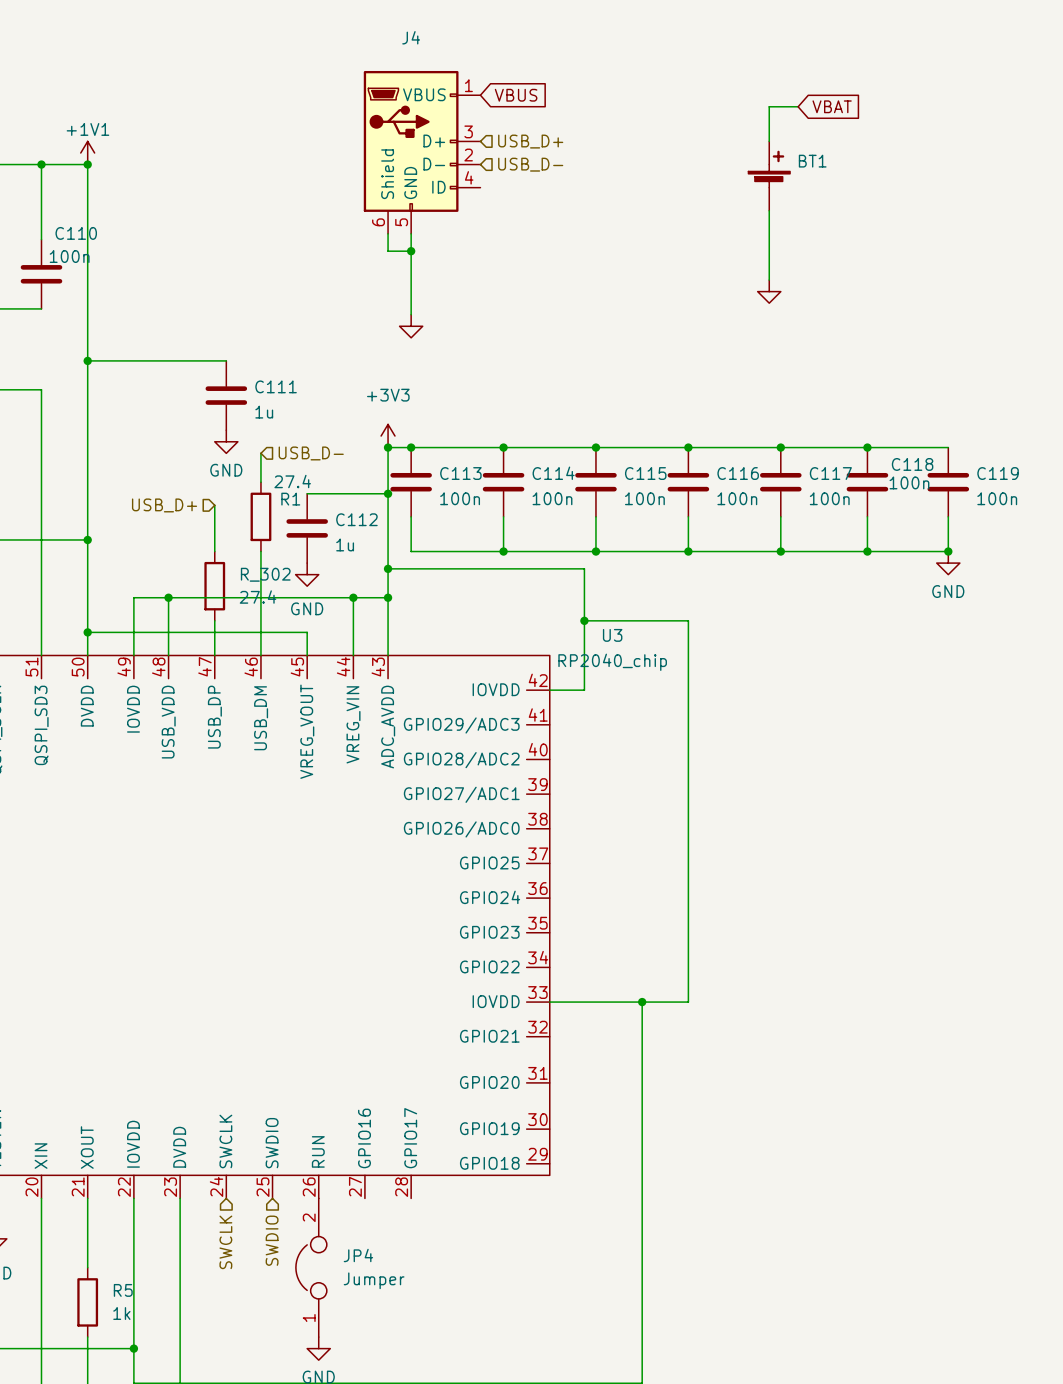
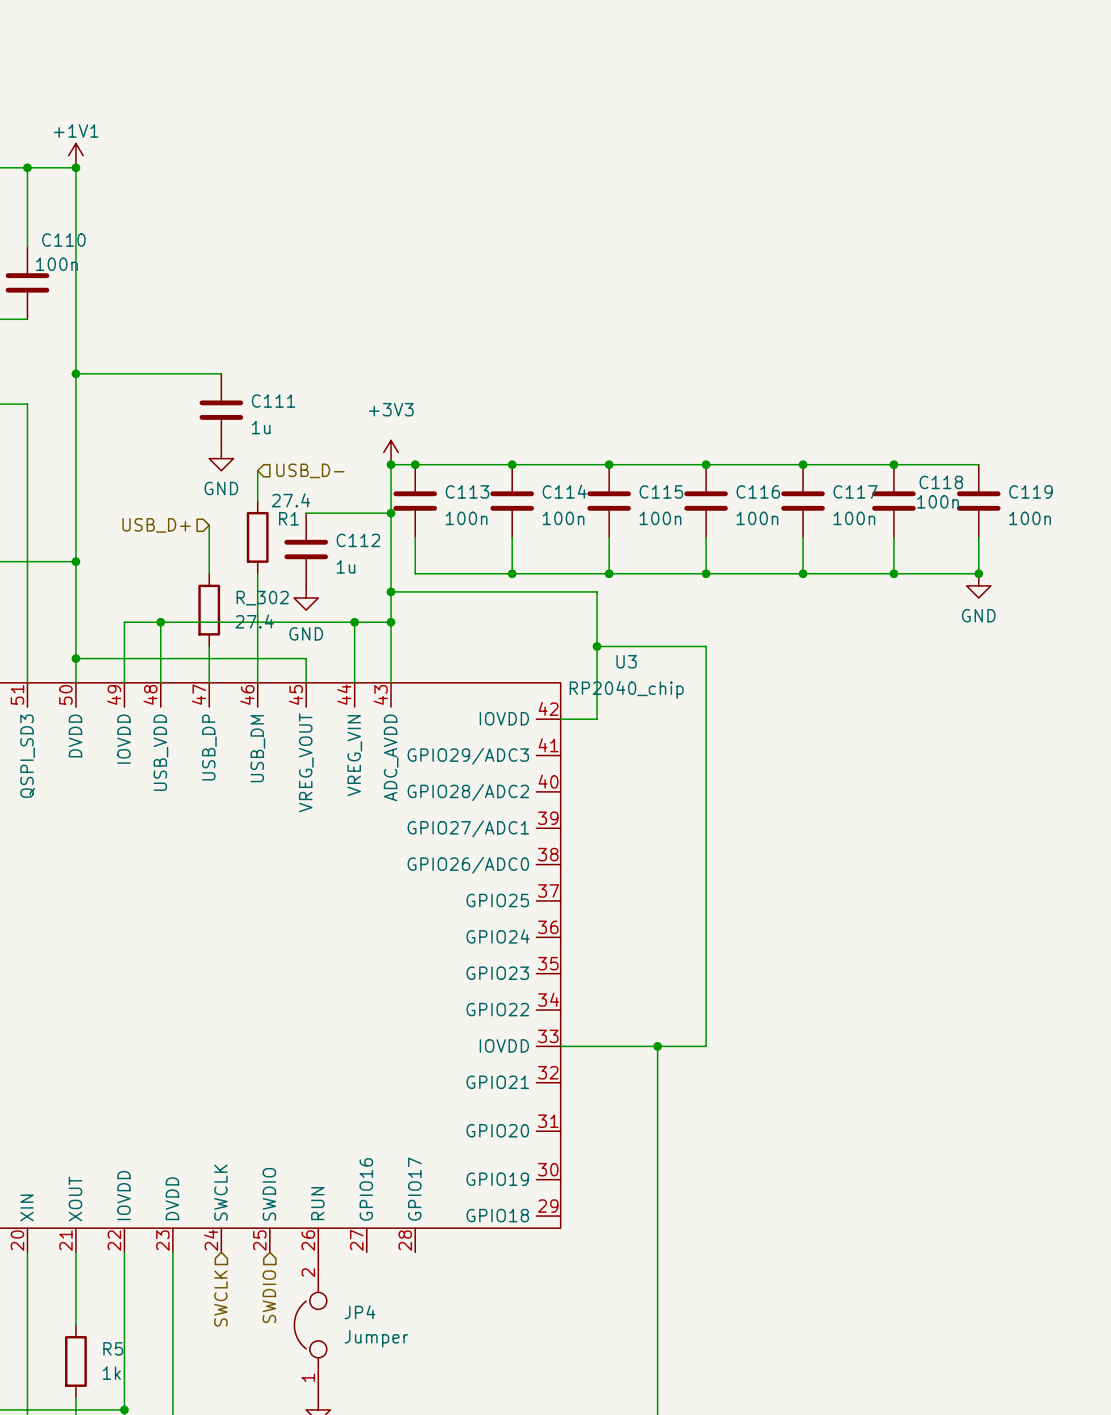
global label: VBUS (516, 95) -> none
wire: (798, 106) (769, 106) (769, 141) -> none
global label: VBAT (832, 106) -> none
hierarchical label: USB_D+ (530, 141) -> none
J4: (422, 152) -> none
hierarchical label: USB_D- (530, 164) -> none
BT1: (769, 176) -> none
wire: (769, 210) (769, 280) -> none
wire: (388, 233) (388, 251) (411, 251) -> none
wire: (411, 233) (411, 314) -> none
junction: (411, 251) -> none
power symbol: (769, 291) -> none
power symbol: (411, 326) -> none

